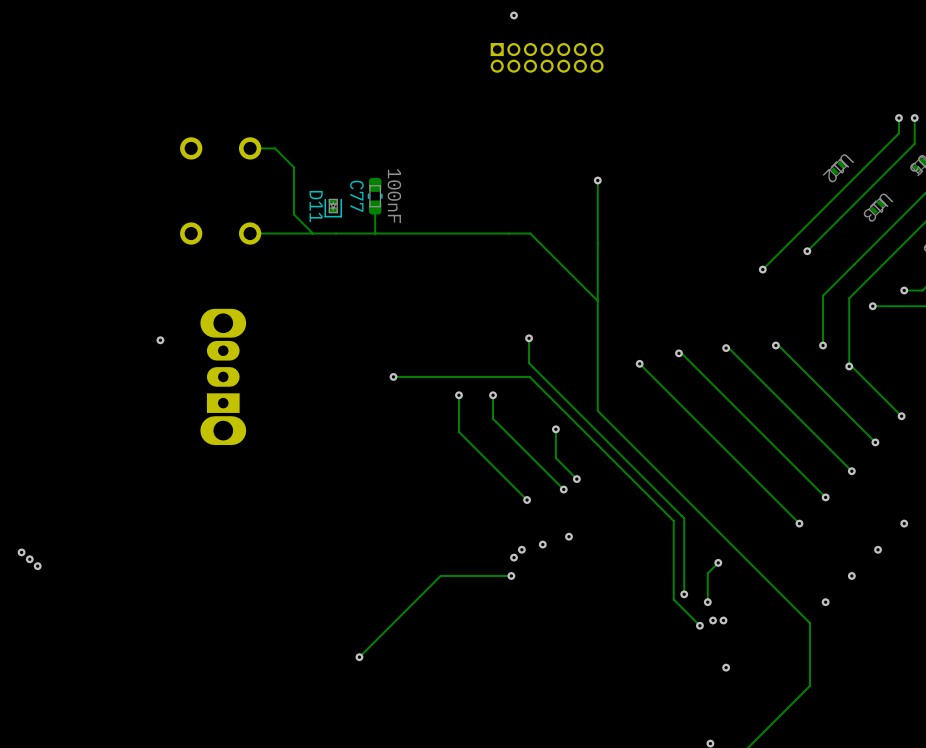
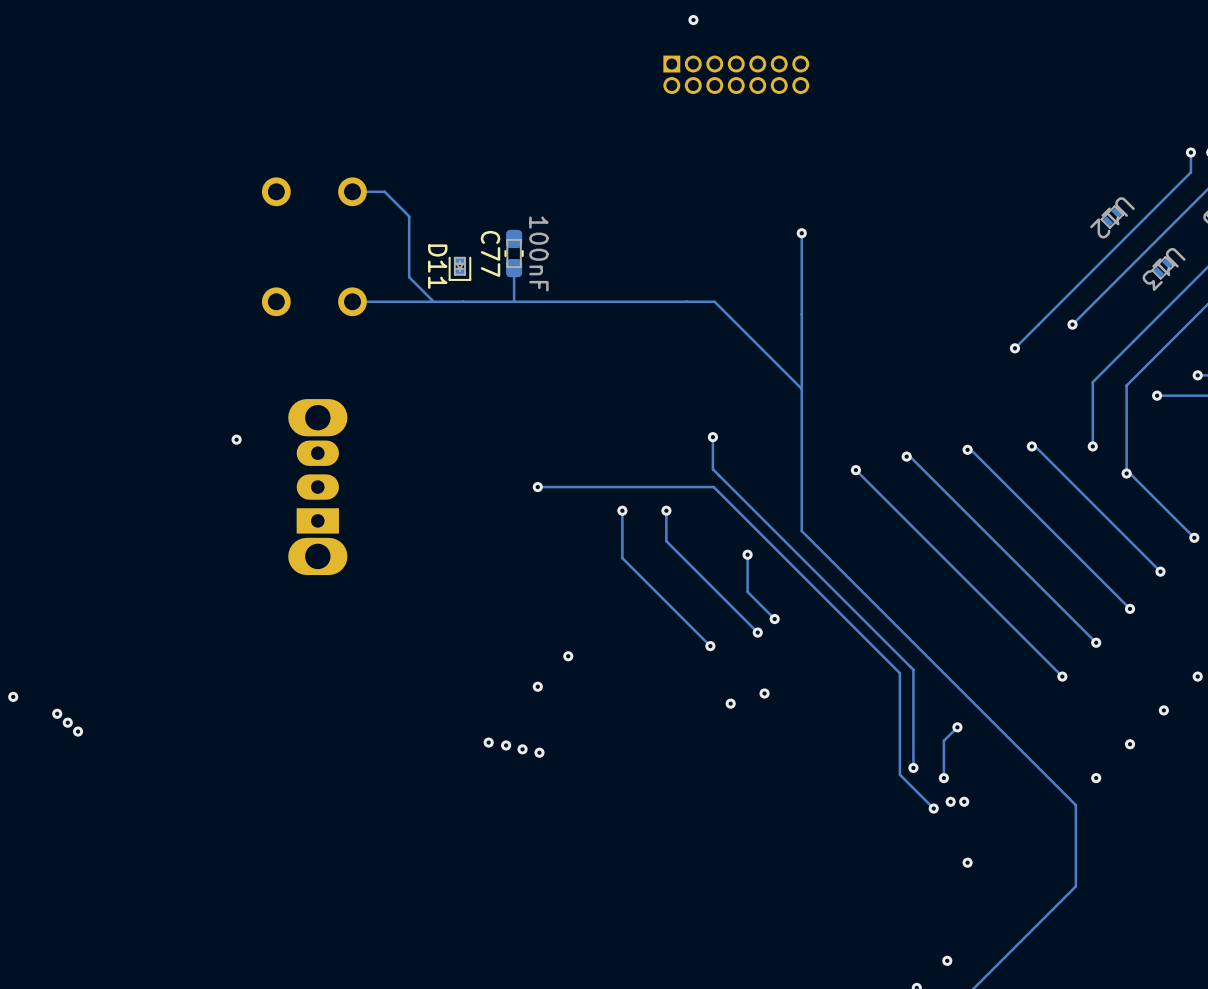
via: none -> (568, 656)
via: none -> (537, 686)
via: (521, 549) -> none
via: (514, 557) -> none
via: none -> (488, 742)
track: (511, 575) (440, 575) (359, 657) -> none
via: (511, 575) -> none
via: none -> (506, 745)
via: none -> (522, 749)
via: none -> (539, 752)
via: (359, 657) -> none

